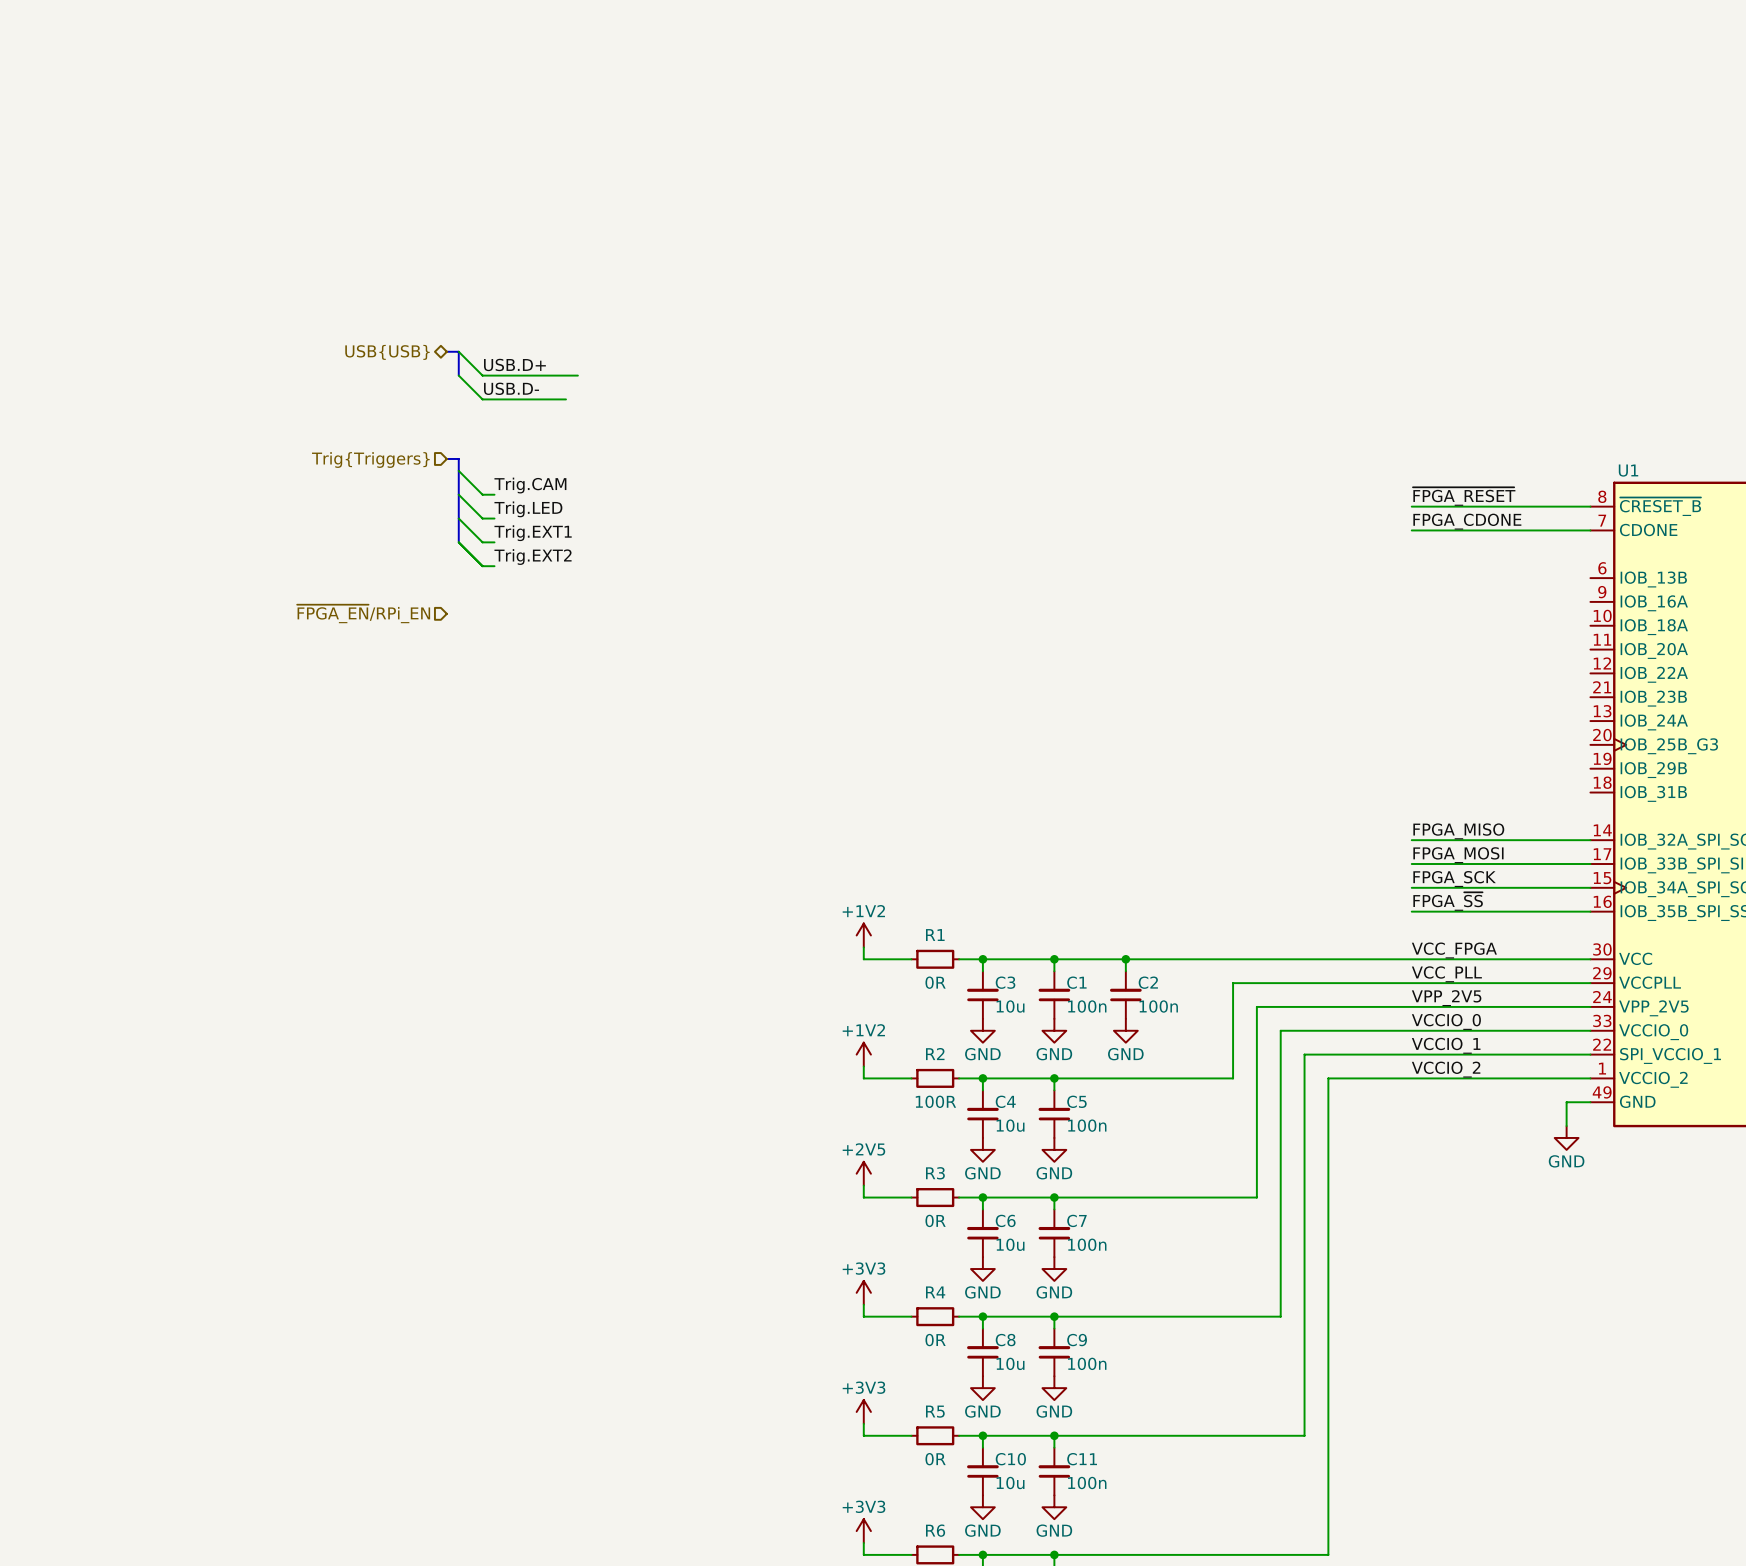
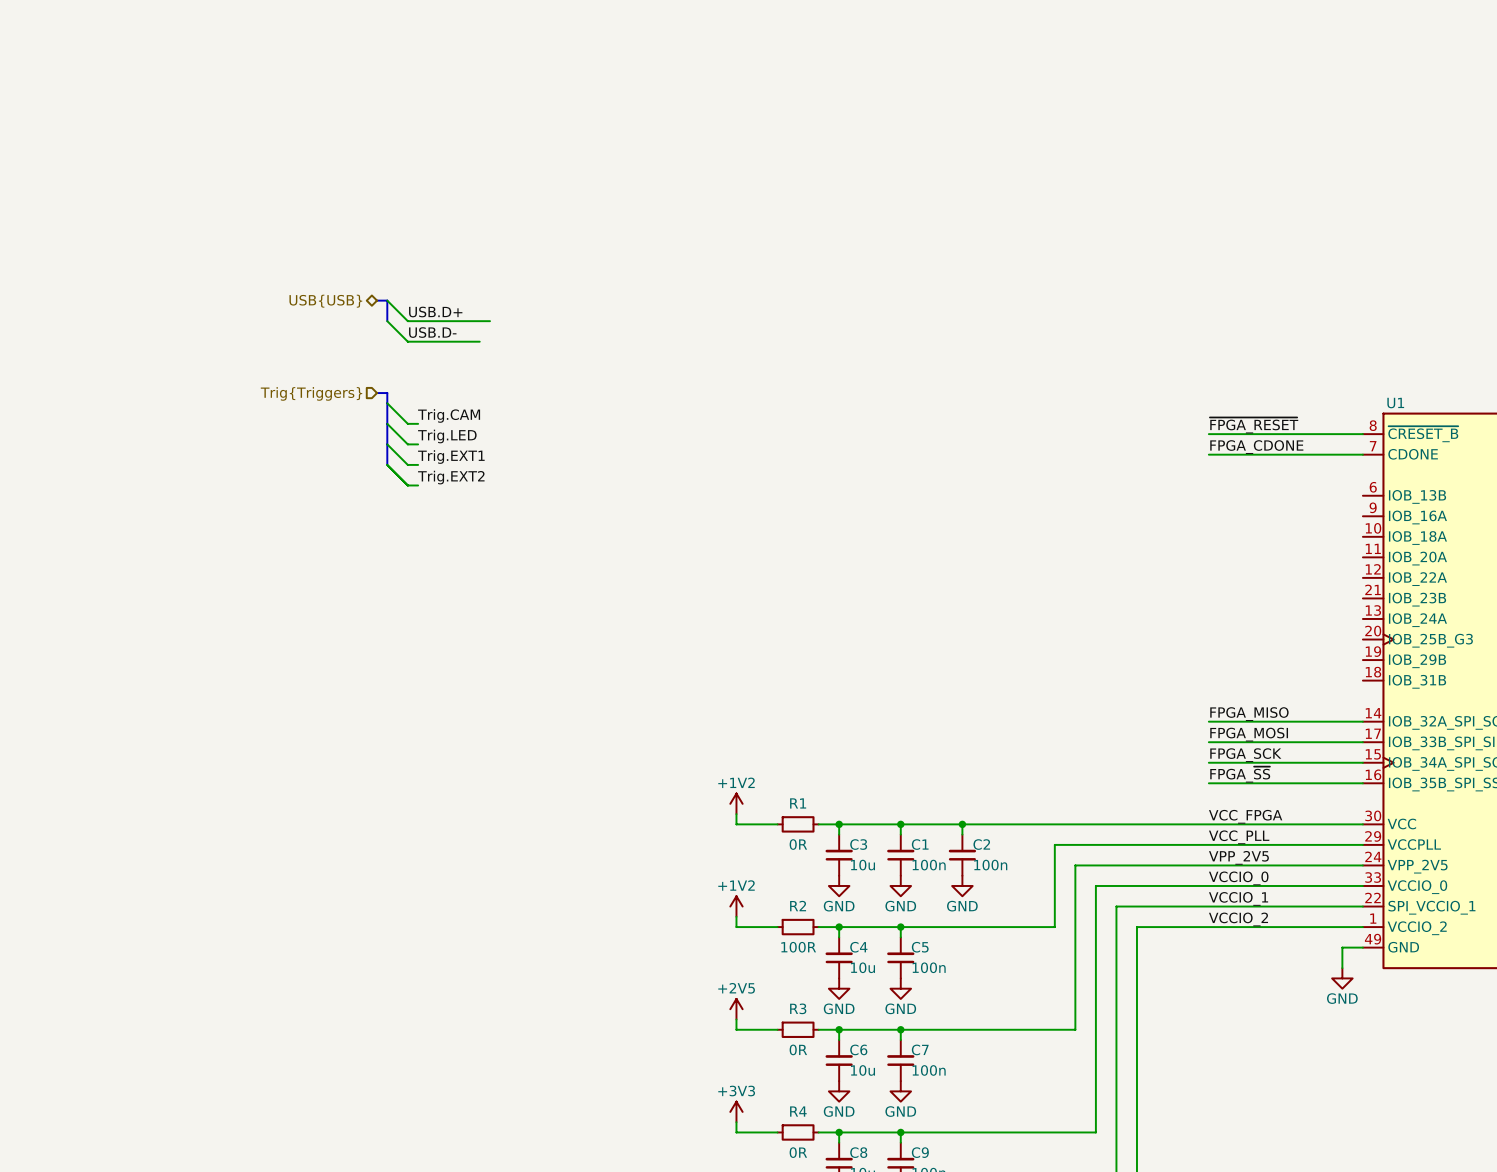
hierarchical label: ~{FPGA_EN}/RPi_EN (363, 613) -> none

